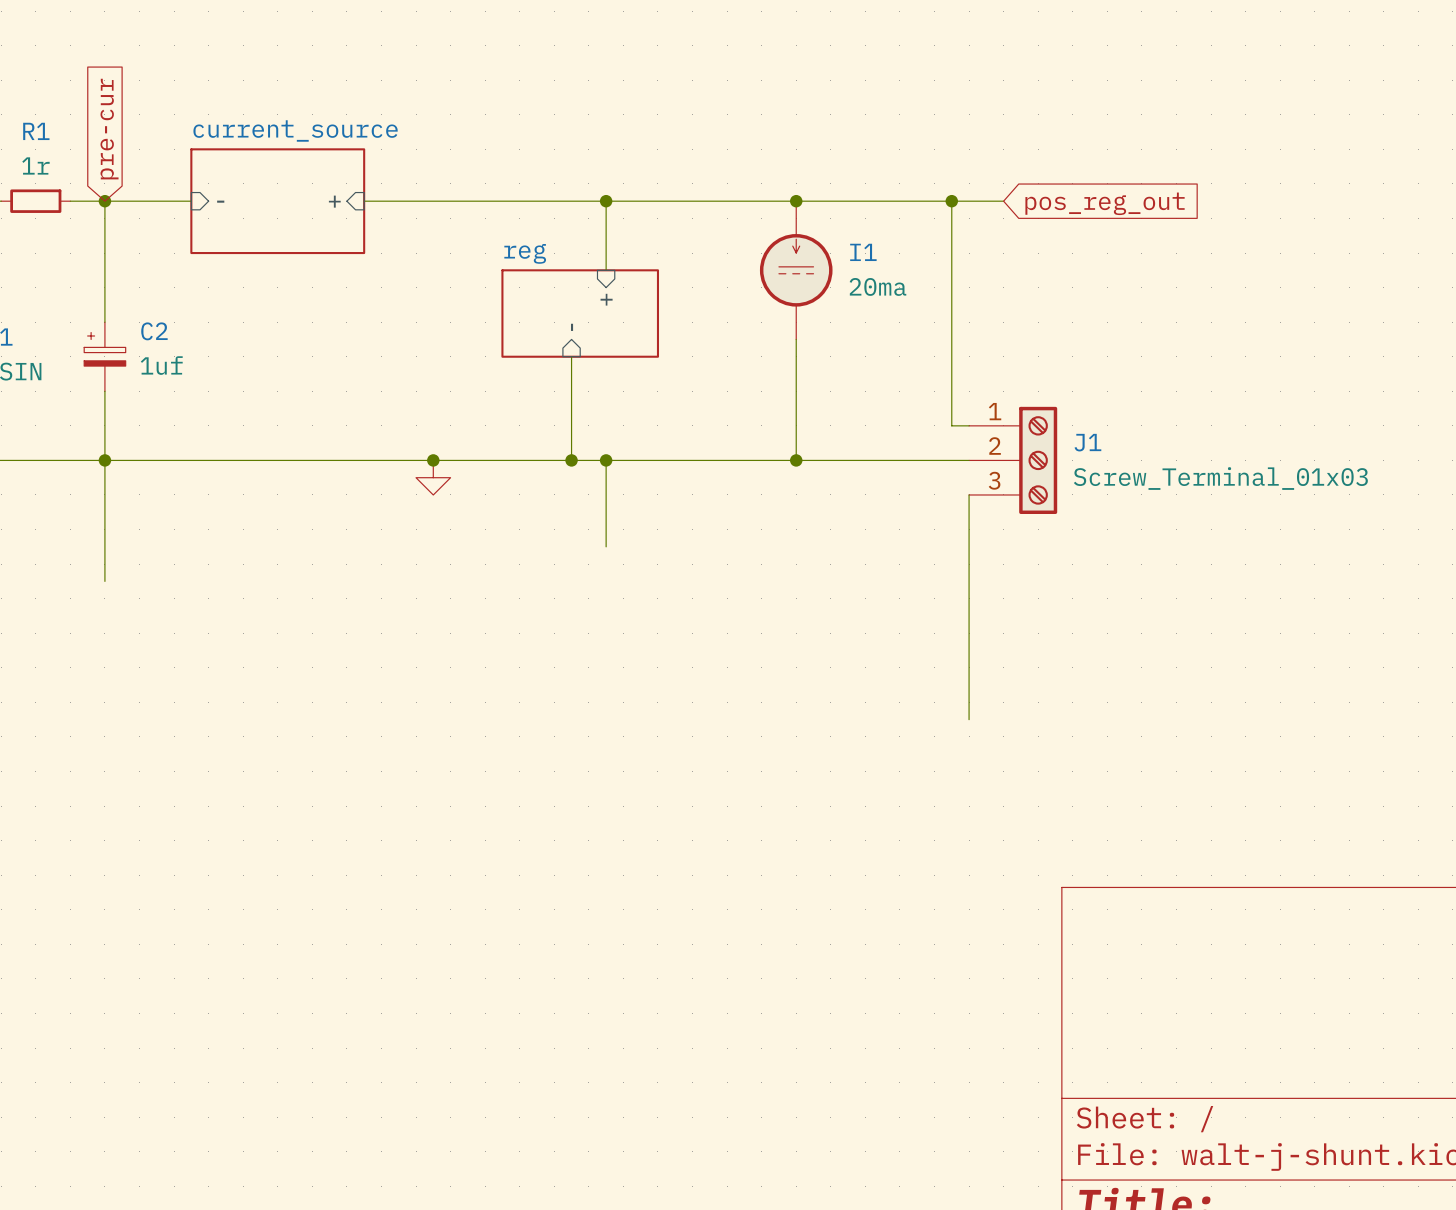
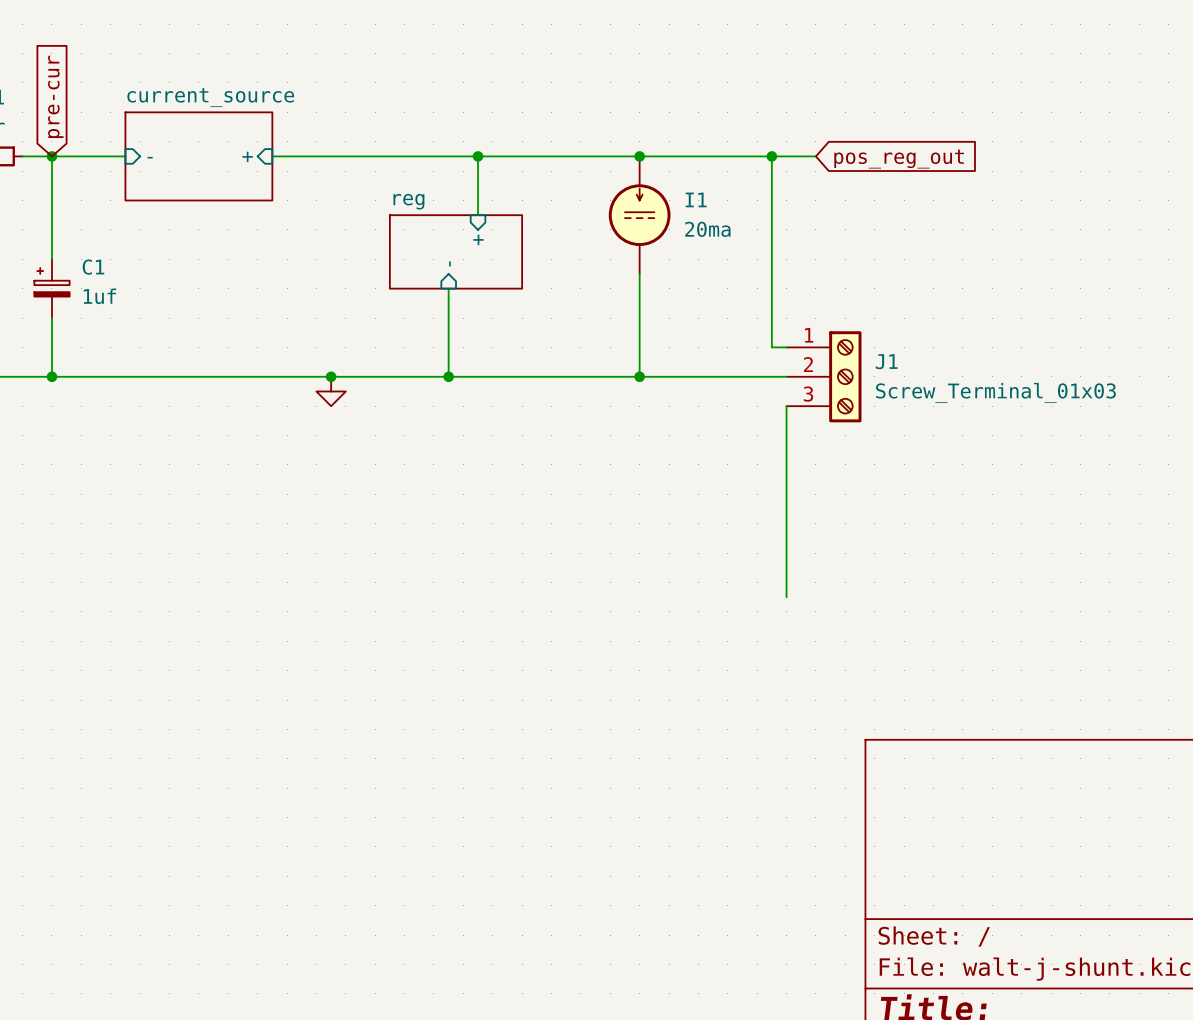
C2 name: C2 (154, 331) -> C1 (93, 267)
wire: (104, 460) (104, 581) -> none
wire: (606, 460) (606, 546) -> none
junction: (606, 460) -> none

